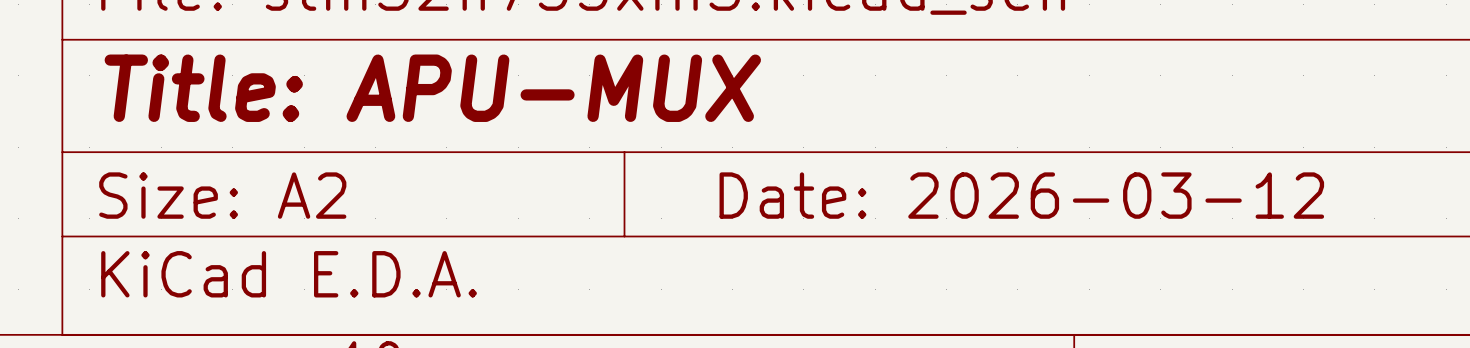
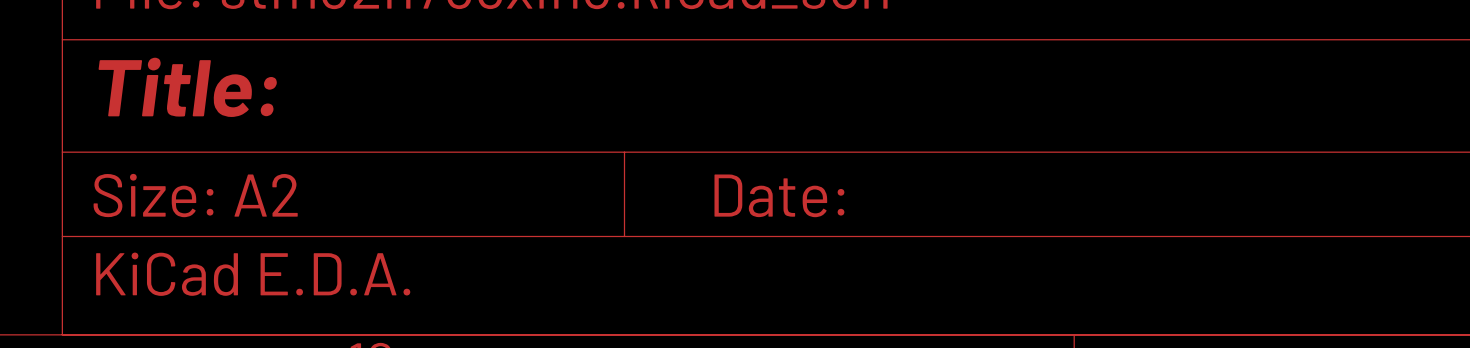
title block: Title: APU-MUX (432, 88) -> Title: (187, 87)
title block: Date: 2026-03-12 (1021, 195) -> Date: (779, 195)

